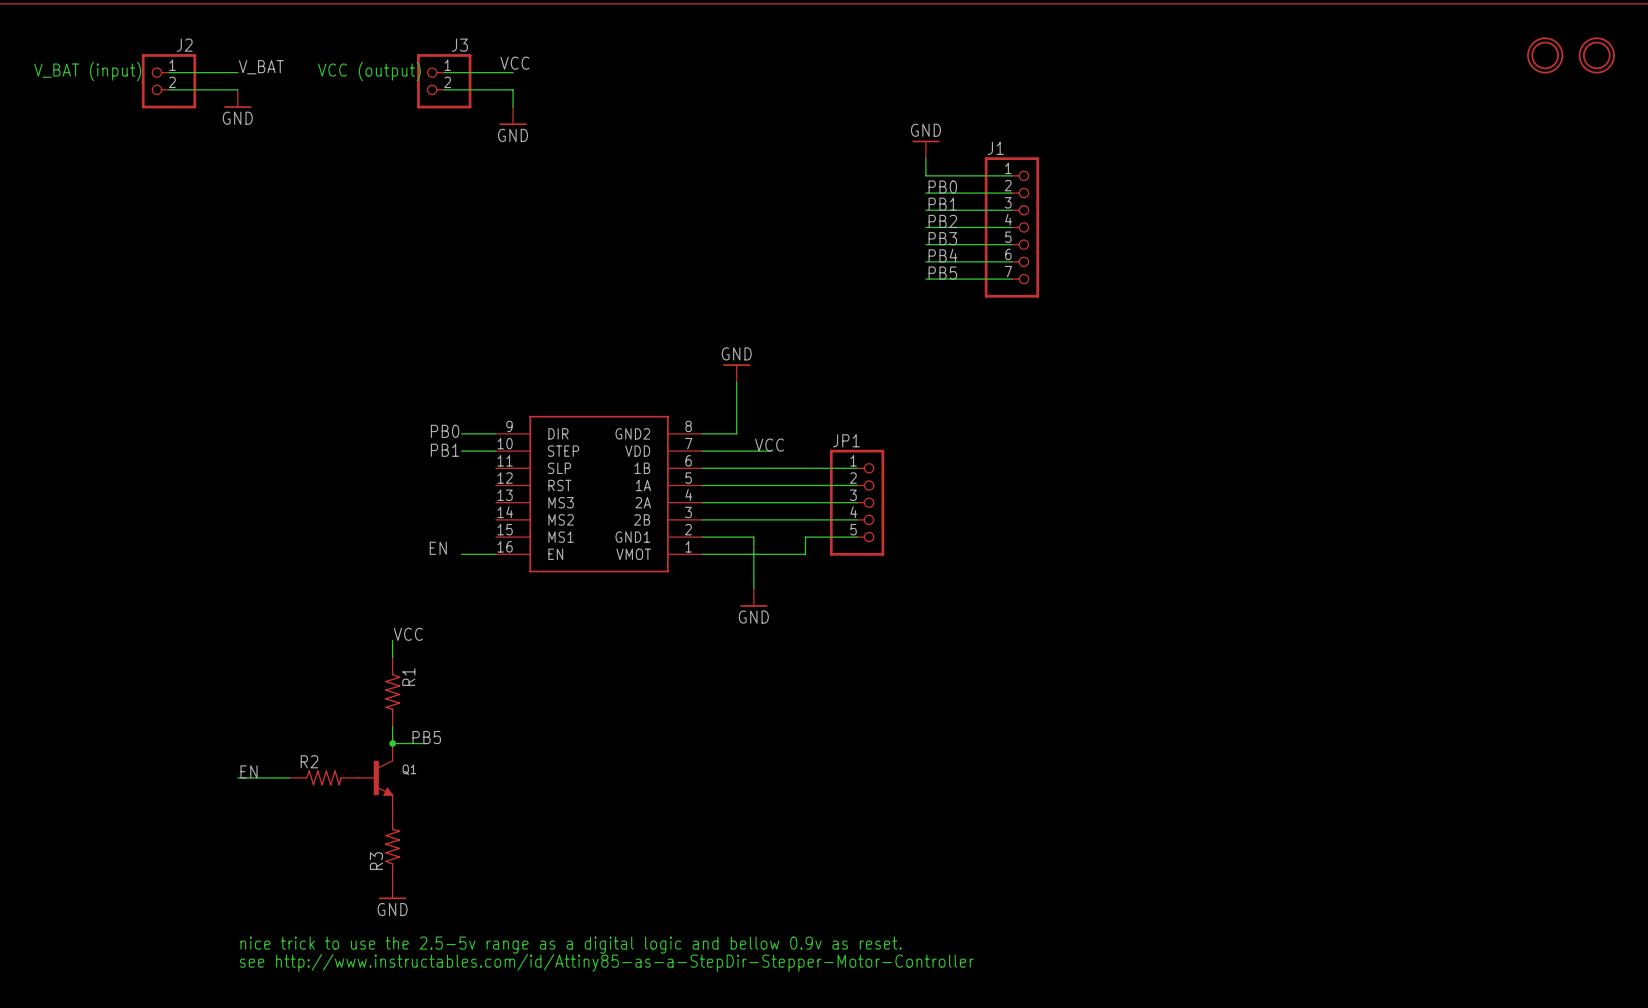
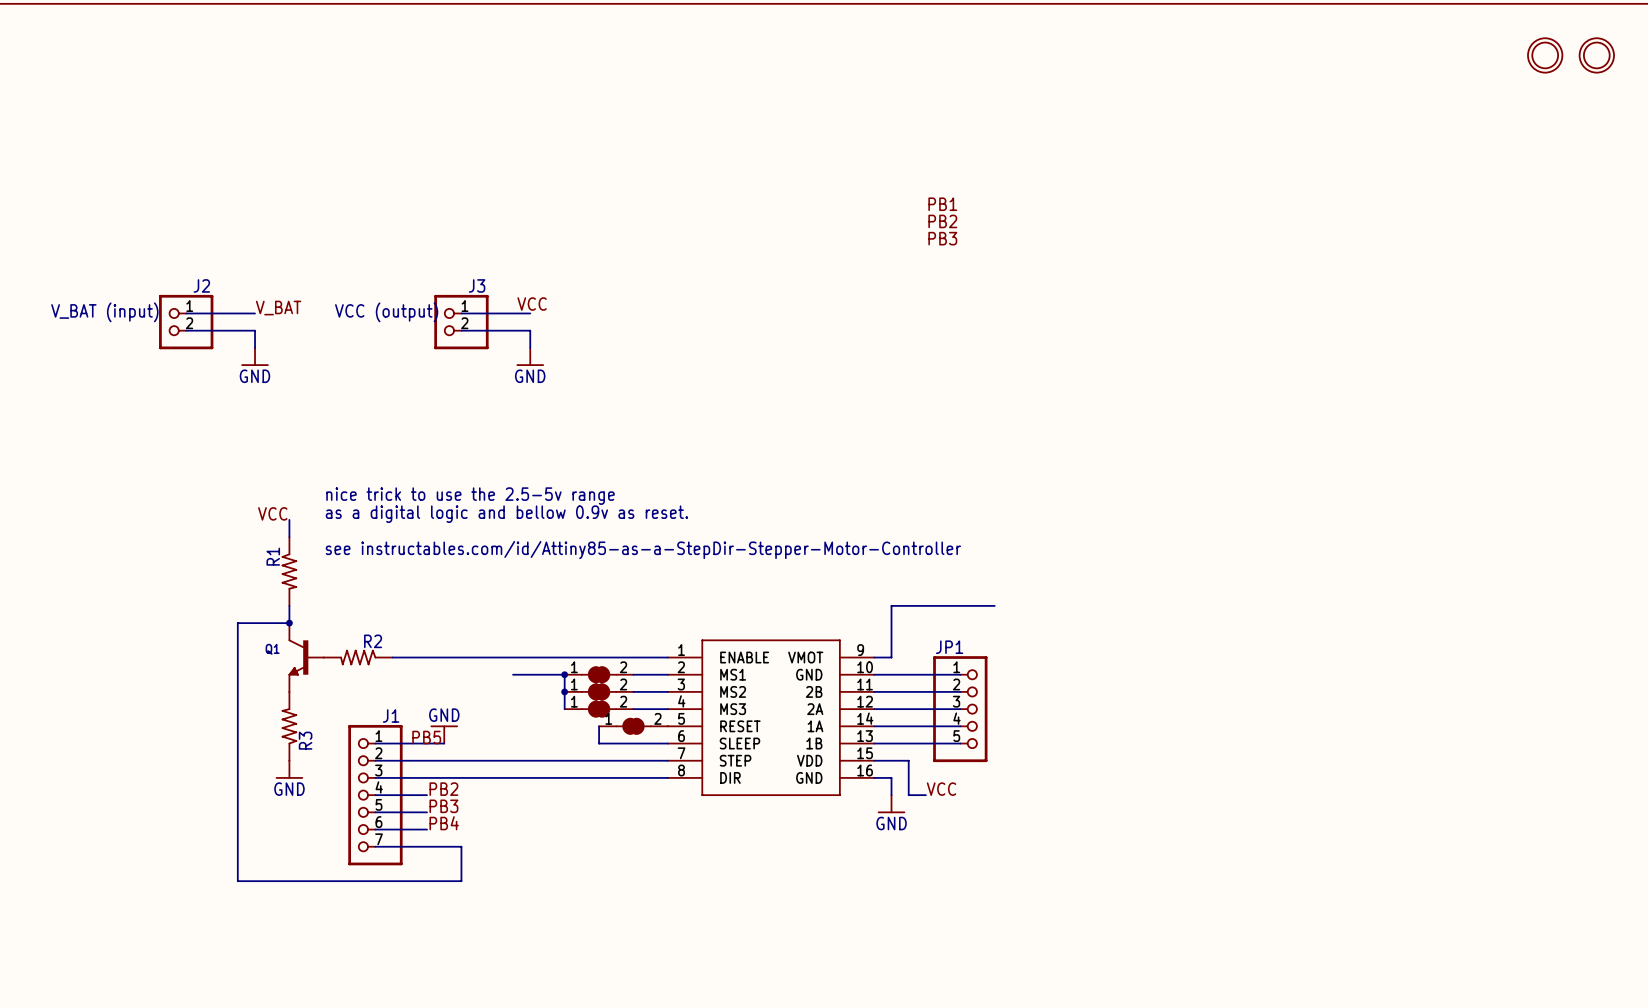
label: VCC (514, 63) -> none
label: V_BAT (261, 67) -> none
text: V_BAT (input) (87, 71) -> none
text: VCC (output) (369, 71) -> none
wire: (169, 72) (237, 72) -> none
wire: (444, 72) (513, 72) -> none
J2 position: (169, 81) -> (186, 322)
J3 position: (444, 81) -> (461, 322)
wire: (169, 89) (237, 89) -> none
wire: (444, 89) (513, 89) (513, 107) -> none
power symbol: GND (237, 98) -> none
power symbol: GND (513, 116) -> none
power symbol: GND (925, 149) -> none
wire: (925, 158) (925, 175) (1011, 175) -> none
label: PB0 (942, 187) -> none
wire: (925, 193) (1011, 193) -> none
wire: (925, 210) (1011, 210) -> none
wire: (925, 227) (1011, 227) -> none
J1 flip: as is (1011, 227) -> left-right (375, 795)
J1 position: (1011, 227) -> (375, 795)
wire: (925, 244) (1011, 244) -> none
label: PB4 (943, 255) -> none
wire: (925, 261) (1011, 261) -> none
label: PB5 (942, 273) -> none
wire: (925, 279) (1011, 279) -> none
label: none -> VCC (532, 304)
label: none -> V_BAT (278, 308)
text: none -> V_BAT (input) (104, 312)
text: none -> VCC (output) (386, 312)
wire: none -> (186, 313) (255, 313)
wire: none -> (461, 313) (530, 313)
wire: none -> (186, 330) (255, 330) (255, 347)
wire: none -> (461, 330) (530, 330) (530, 347)
power symbol: none -> GND (255, 356)
power symbol: none -> GND (530, 356)
power symbol: GND (736, 373) -> none
wire: (736, 382) (736, 433) (702, 433) -> none
label: PB0 (445, 431) -> none
wire: (461, 433) (495, 433) -> none
label: VCC (769, 445) -> none
label: PB1 (445, 450) -> none
wire: (461, 451) (495, 451) -> none
wire: (702, 451) (771, 451) -> none
wire: (702, 468) (857, 468) -> none
wire: (702, 485) (857, 485) -> none
part: (599, 494) -> none
text: none -> nice trick to use the 2.5-5v range (470, 496)
wire: (702, 502) (857, 502) -> none
JP1 position: (857, 502) -> (960, 709)
text: none -> as a digital logic and bellow 0.9v as reset. (506, 514)
wire: none -> (289, 519) (289, 537)
wire: (702, 519) (857, 519) -> none
wire: (702, 537) (753, 537) (753, 588) -> none
wire: (857, 537) (805, 537) (805, 554) (702, 554) -> none
label: EN (438, 548) -> none
text: none -> see instructables.com/id/Attiny85-as-a-StepDir-Stepper-Motor-Controller (643, 550)
wire: (461, 554) (495, 554) -> none
power symbol: GND (753, 597) -> none
wire: none -> (289, 605) (289, 623) (237, 623) (237, 881) (461, 881) (461, 846) (375, 846)
wire: none -> (994, 605) (891, 605) (891, 657) (874, 657)
junction: none -> (289, 623)
label position: VCC (408, 634) -> VCC (272, 513)
wire: (392, 640) (392, 657) -> (667, 657) (392, 657)
wire: none -> (513, 674) (564, 674) (564, 709)
junction: none -> (564, 674)
part: none -> (599, 674)
wire: none -> (633, 674) (667, 674)
wire: none -> (874, 674) (960, 674)
R1 flip: as is (392, 691) -> left-right (289, 571)
R1 position: (392, 691) -> (289, 571)
junction: none -> (564, 691)
part: none -> (599, 691)
wire: none -> (633, 691) (667, 691)
wire: none -> (874, 691) (960, 691)
part: none -> (599, 709)
wire: none -> (633, 709) (667, 709)
wire: none -> (874, 709) (960, 709)
part: none -> (771, 717)
wire: (392, 726) (392, 743) -> (375, 743) (392, 743)
wire: none -> (599, 726) (599, 743) (667, 743)
part: none -> (633, 726)
wire: none -> (874, 726) (960, 726)
power symbol: none -> GND (444, 734)
junction: (392, 743) -> none
wire: none -> (427, 743) (444, 743)
wire: none -> (874, 743) (960, 743)
wire: none -> (375, 760) (667, 760)
wire: none -> (874, 760) (908, 760) (908, 795) (925, 795)
power symbol: none -> GND (289, 769)
label: EN (249, 771) -> none
wire: (237, 777) (289, 777) -> (375, 795) (427, 795)
R2 flip: as is (323, 777) -> left-right (358, 657)
R2 position: (323, 777) -> (358, 657)
wire: none -> (375, 777) (667, 777)
Q1 position: (375, 777) -> (306, 657)
Q1 flip: as is (383, 777) -> left-right (298, 657)
wire: none -> (874, 777) (891, 777) (891, 795)
label: none -> PB2 (443, 789)
label: none -> VCC (941, 789)
power symbol: none -> GND (891, 804)
label: none -> PB3 (443, 806)
wire: none -> (375, 812) (427, 812)
label: none -> PB4 (444, 823)
wire: none -> (375, 829) (427, 829)
R3 flip: as is (392, 846) -> left-right (289, 726)
R3 position: (392, 846) -> (289, 726)
power symbol: GND (392, 890) -> none
text: nice trick to use the 2.5-5v range as a digital logic and bellow 0.9v as reset. (571, 945) -> none
text: see http://www.instructables.com/id/Attiny85-as-a-StepDir-Stepper-Motor-Controller (606, 962) -> none

